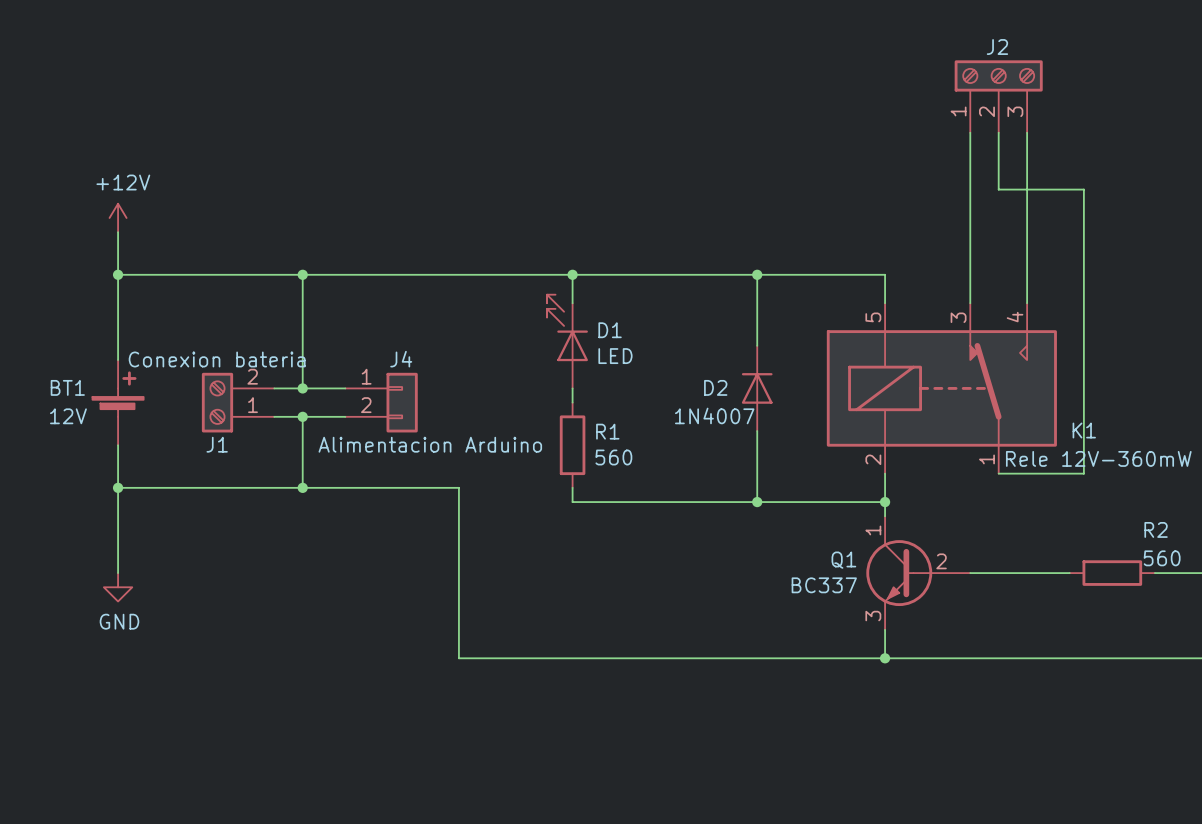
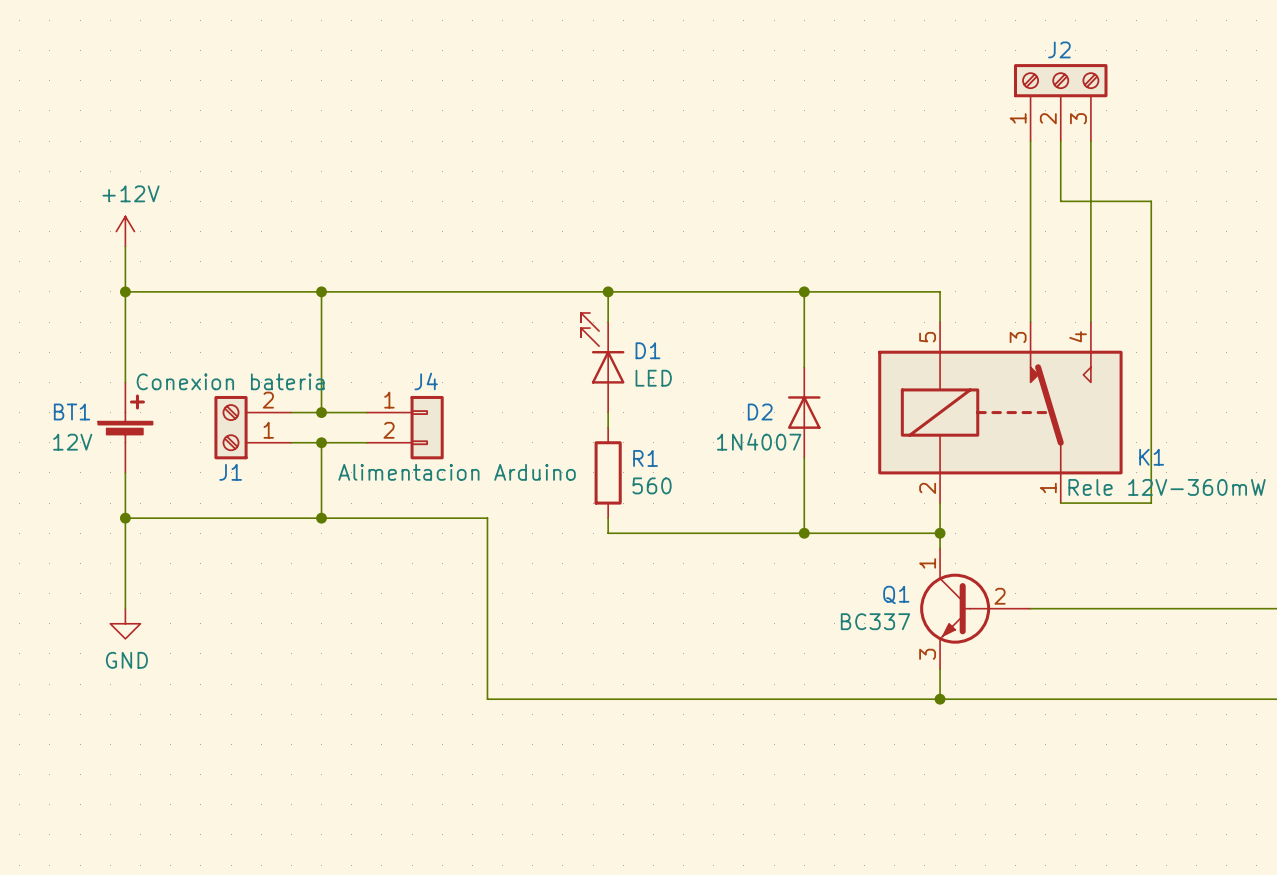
wire: none -> (1136, 608) (1226, 608)
R2: 560 (1112, 573) -> none

